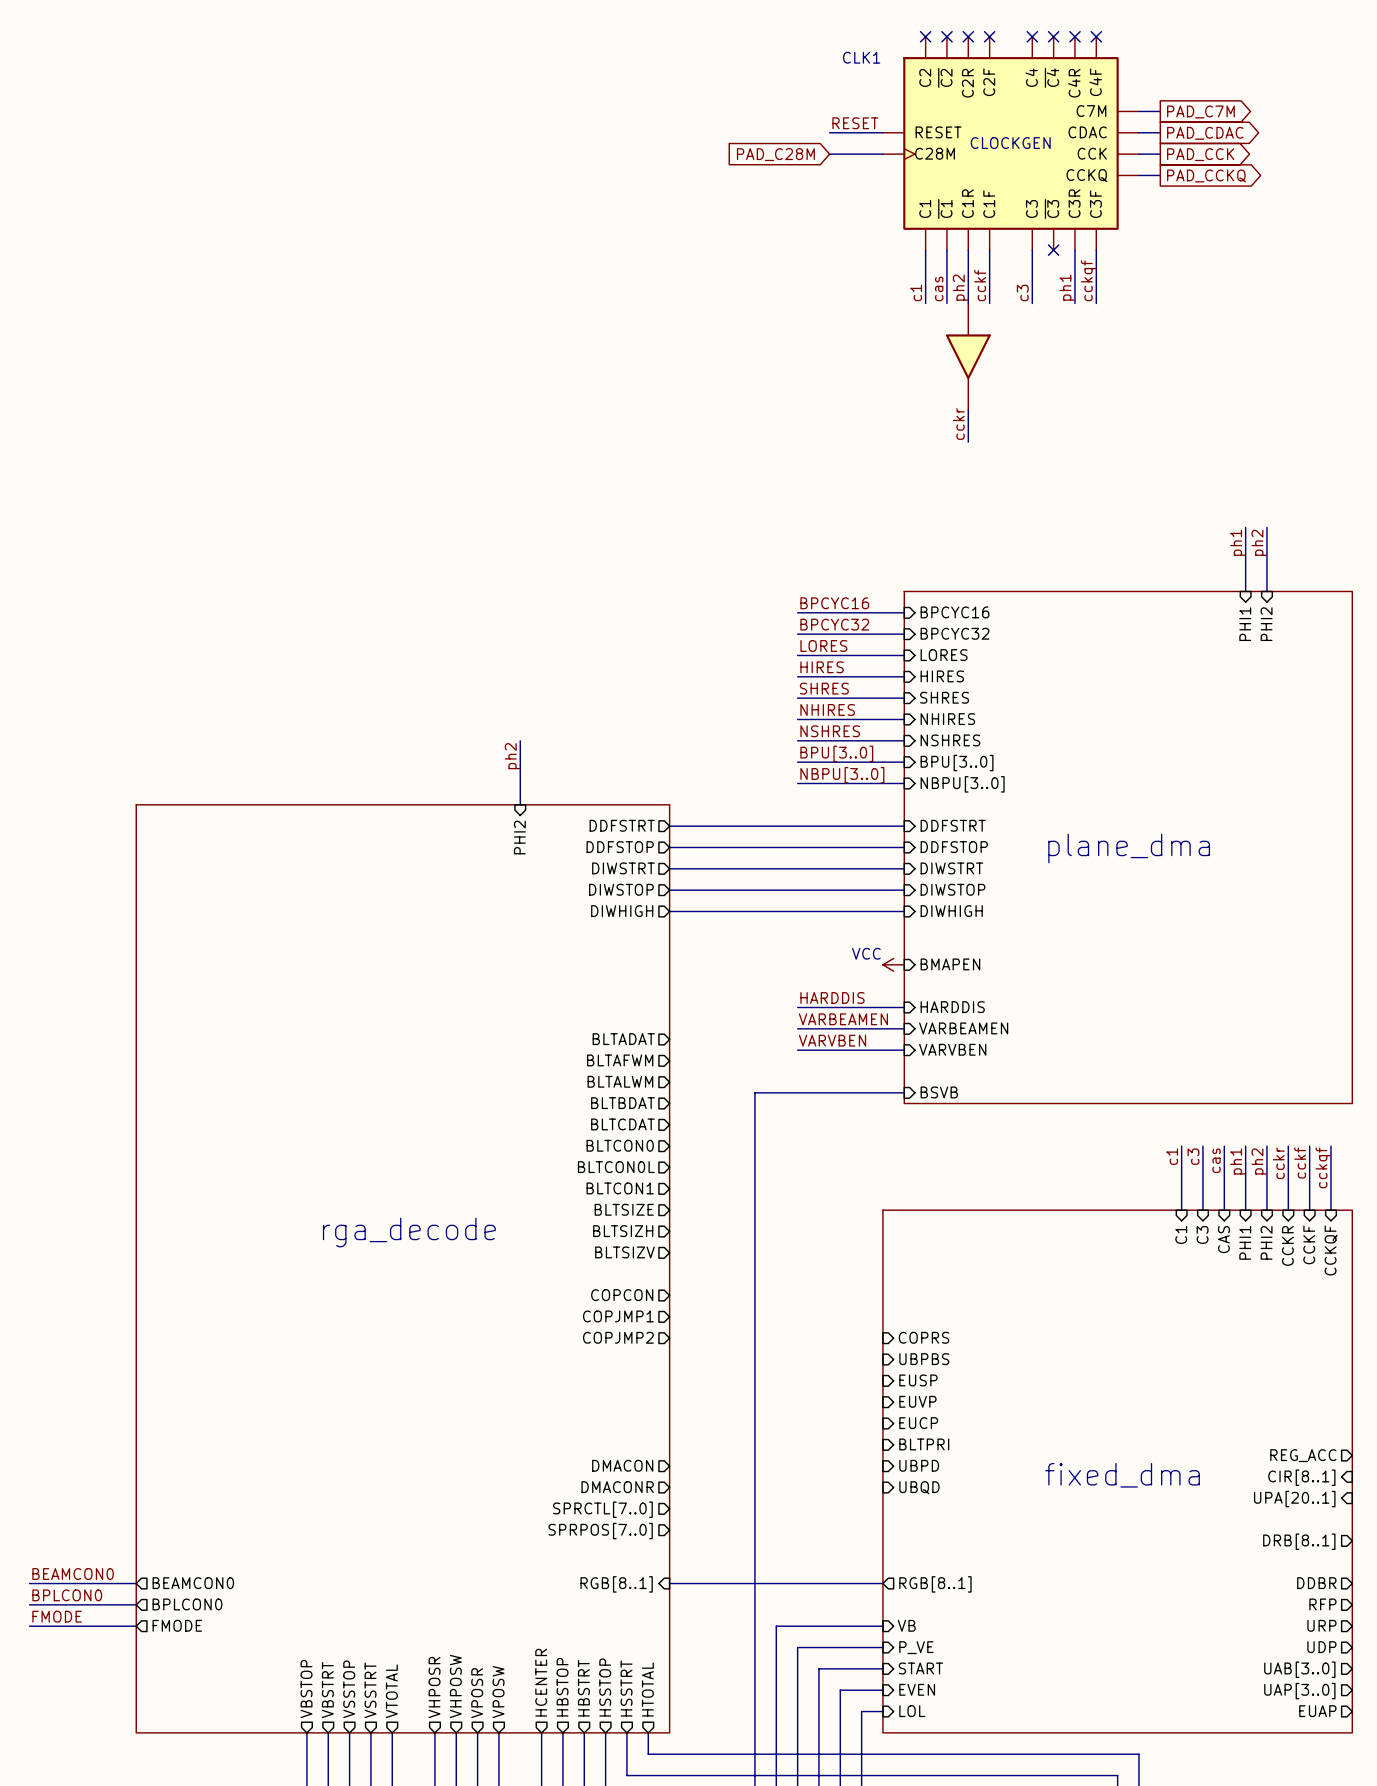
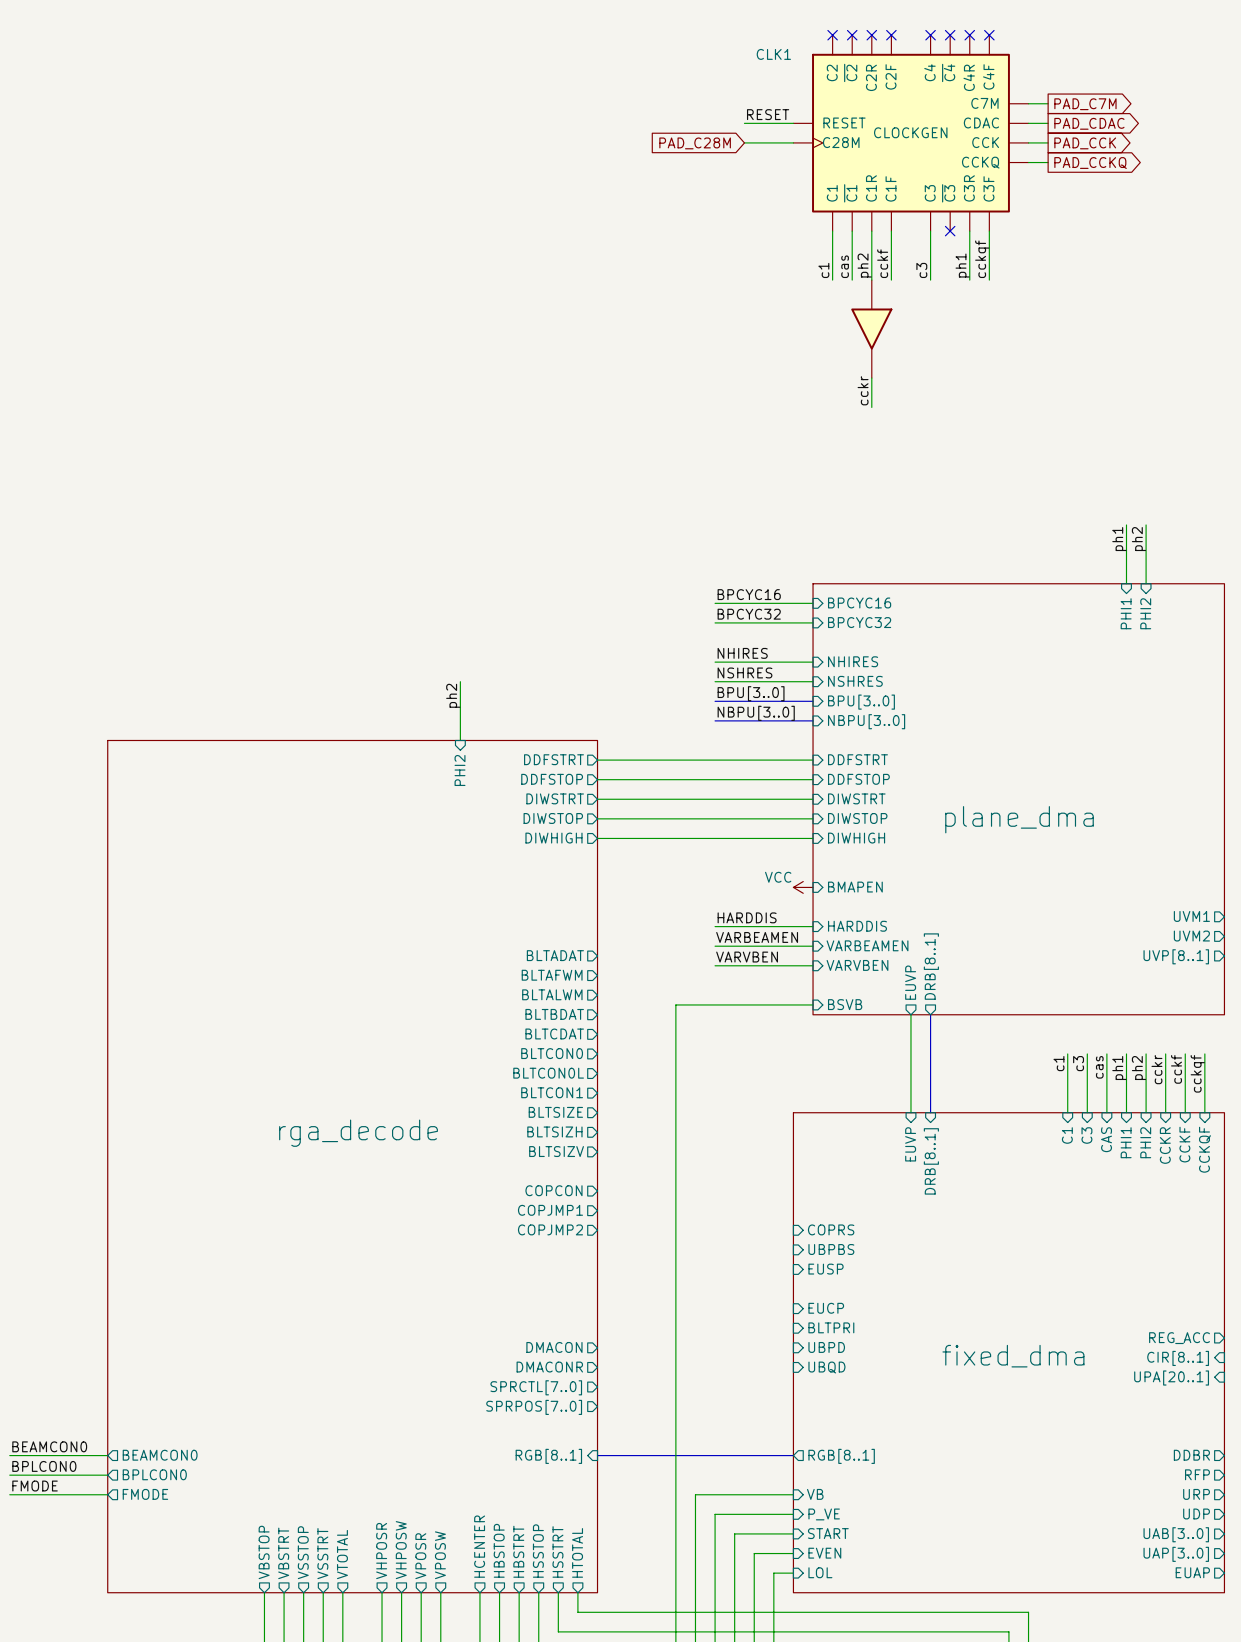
wire: (1245, 527) (1245, 570) -> (1126, 544) (1126, 583)
wire: (1266, 527) (1266, 570) -> (1146, 544) (1146, 583)
label position: ph1 (1237, 542) -> ph1 (1119, 539)
label position: ph2 (1259, 542) -> ph2 (1138, 539)
label: BPCYC16 (834, 603) -> none
wire: (797, 612) (904, 612) -> none
sheet pin: BPCYC16 (955, 612) -> none
label: BPCYC32 (834, 624) -> none
sheet pin position: PHI1 (1245, 624) -> PHI1 (1126, 613)
sheet pin position: PHI2 (1266, 624) -> PHI2 (1145, 613)
sheet pin: BPCYC32 (955, 633) -> none
wire: (797, 634) (904, 634) -> none
label: LORES (823, 645) -> BPCYC16 (749, 594)
sheet pin: LORES (944, 655) -> BPCYC16 (859, 602)
label: HIRES (822, 667) -> BPCYC32 (749, 614)
sheet pin: HIRES (942, 676) -> BPCYC32 (859, 622)
label: SHRES (824, 688) -> none
sheet pin: SHRES (944, 697) -> none
wire: (797, 698) (904, 698) -> none
sheet plane_dma: (1128, 847) -> none
sheet plane_dma: none -> (1018, 799)
sheet pin: none -> UVM1 (1191, 916)
sheet pin: none -> UVM2 (1191, 936)
sheet pin: none -> UVP[8..1] (1176, 956)
sheet pin: none -> DRB[8..1] (931, 966)
sheet pin: none -> EUVP (910, 982)
wire: none -> (910, 1014) (910, 1112)
bus: none -> (930, 1014) (930, 1112)
sheet pin: none -> EUVP (910, 1144)
sheet pin: none -> DRB[8..1] (931, 1161)
sheet pin: EUVP (917, 1401) -> none
sheet pin: DRB[8..1] (1299, 1541) -> none

